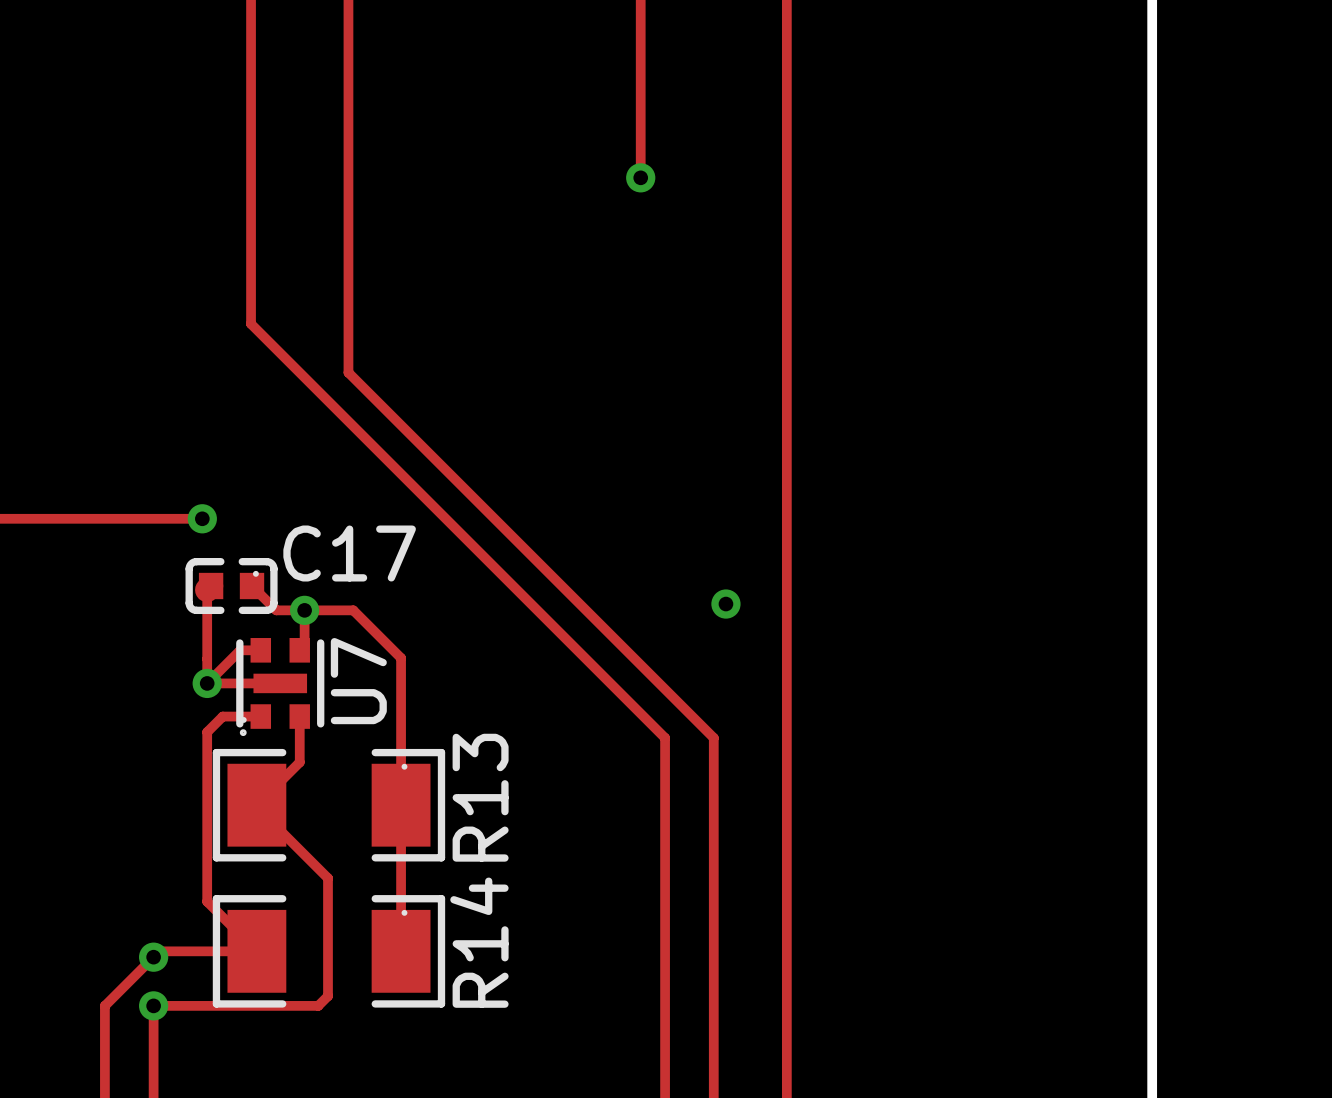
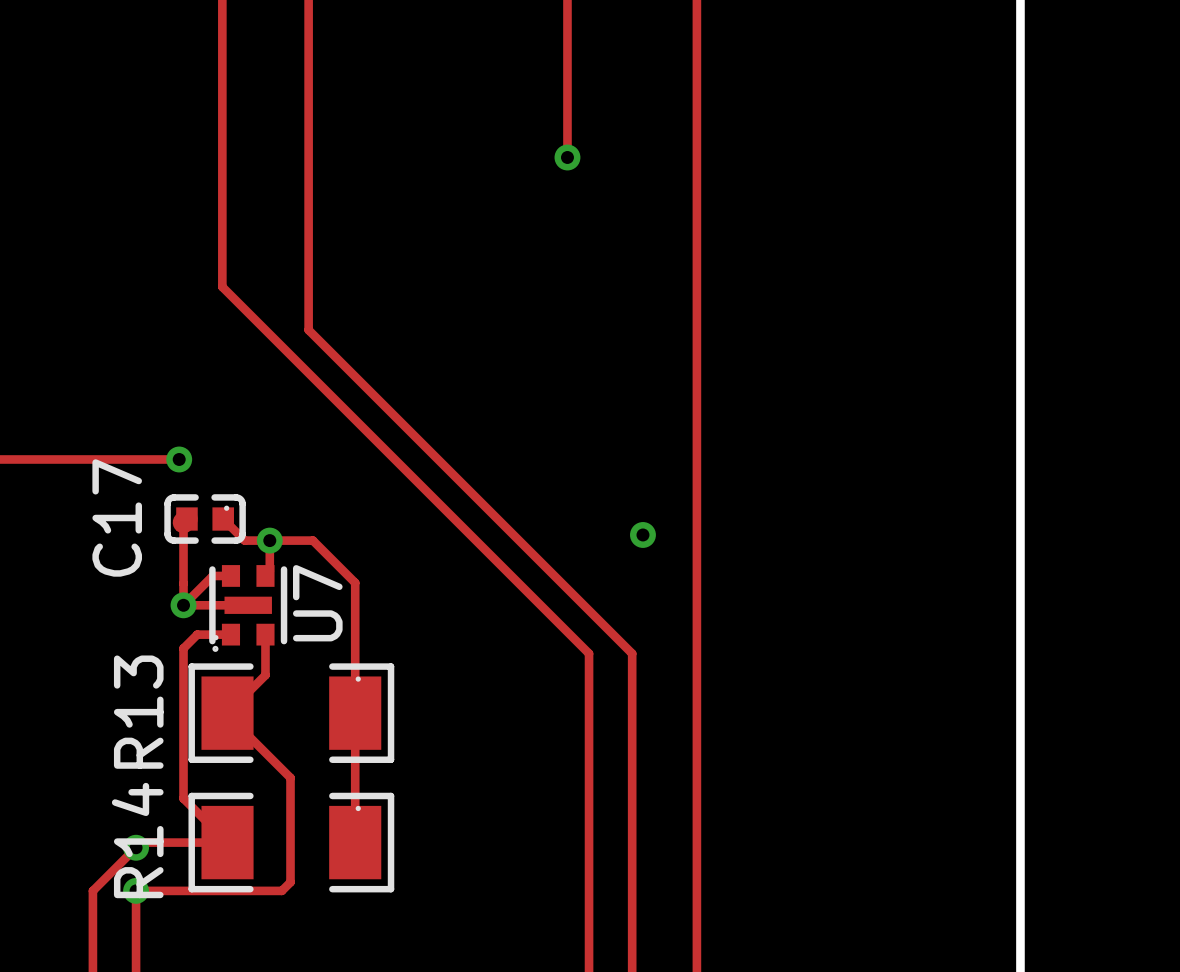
C17 name rotation: 0° (349, 553) -> 90° counterclockwise (117, 517)
C17 name position: C17 (349, 553) -> C17 (117, 517)
R13 name position: R13 (480, 797) -> R13 (138, 712)
R14 name position: R14 (479, 942) -> R14 (137, 840)

